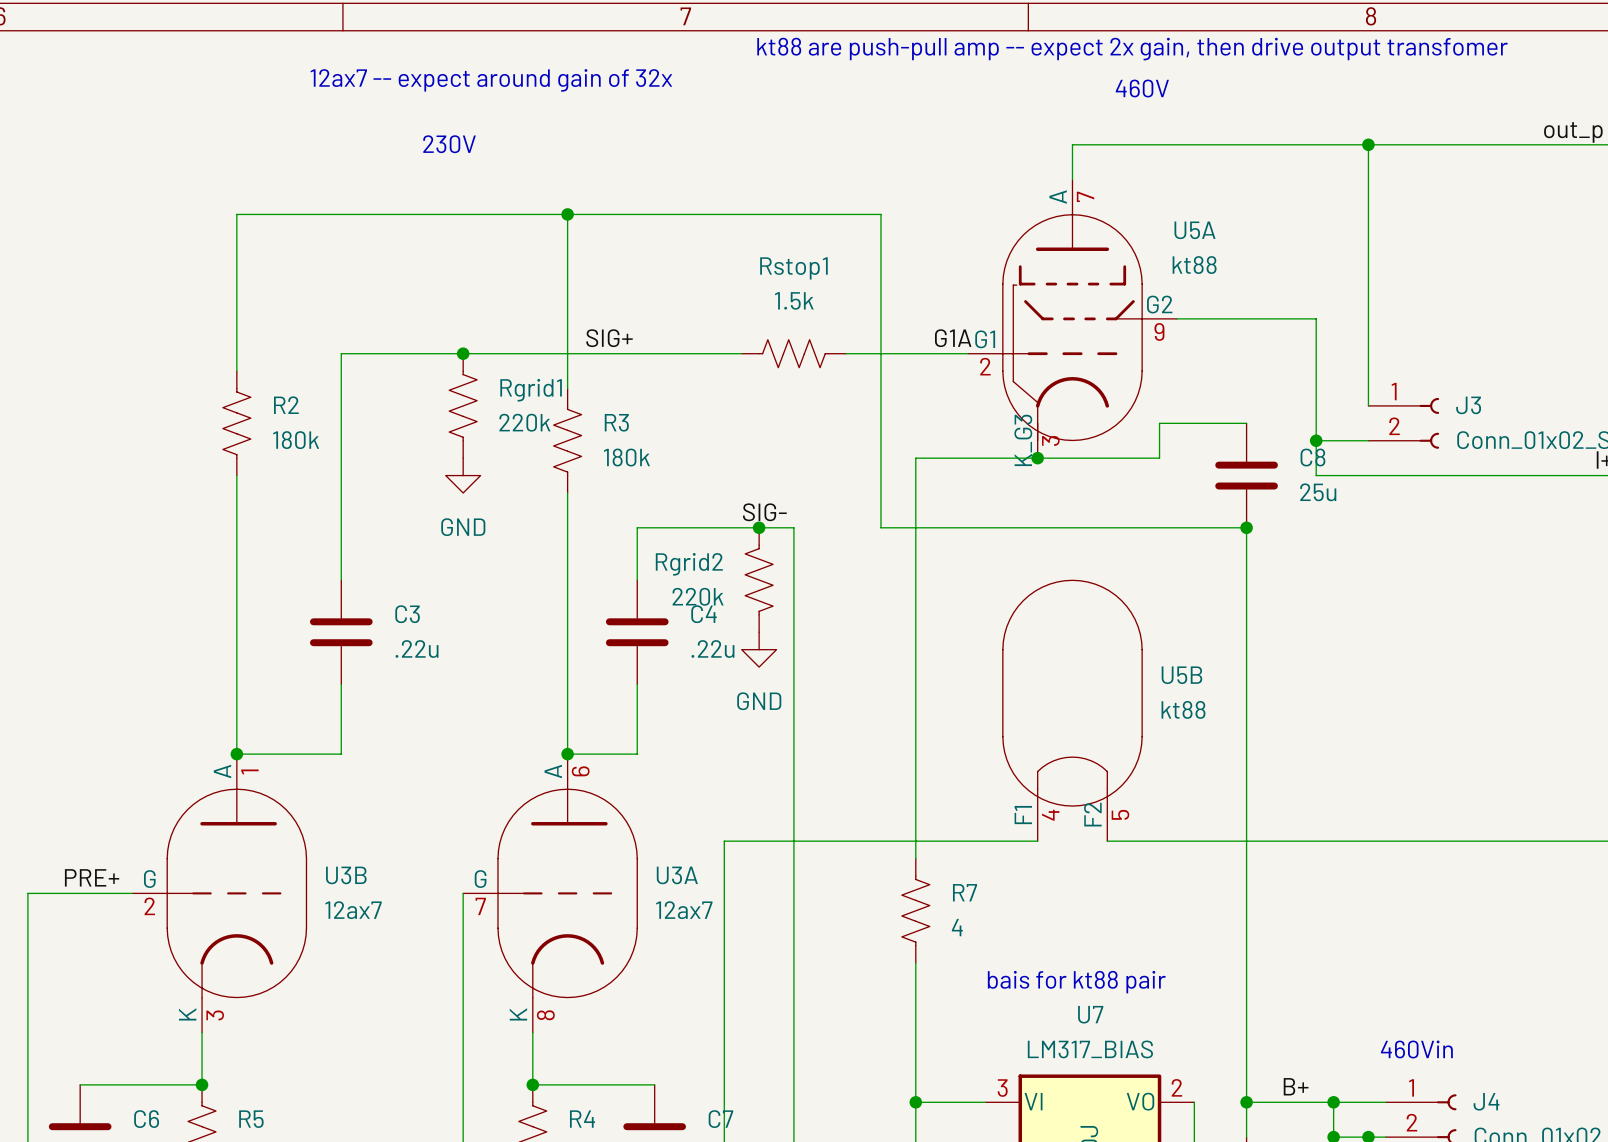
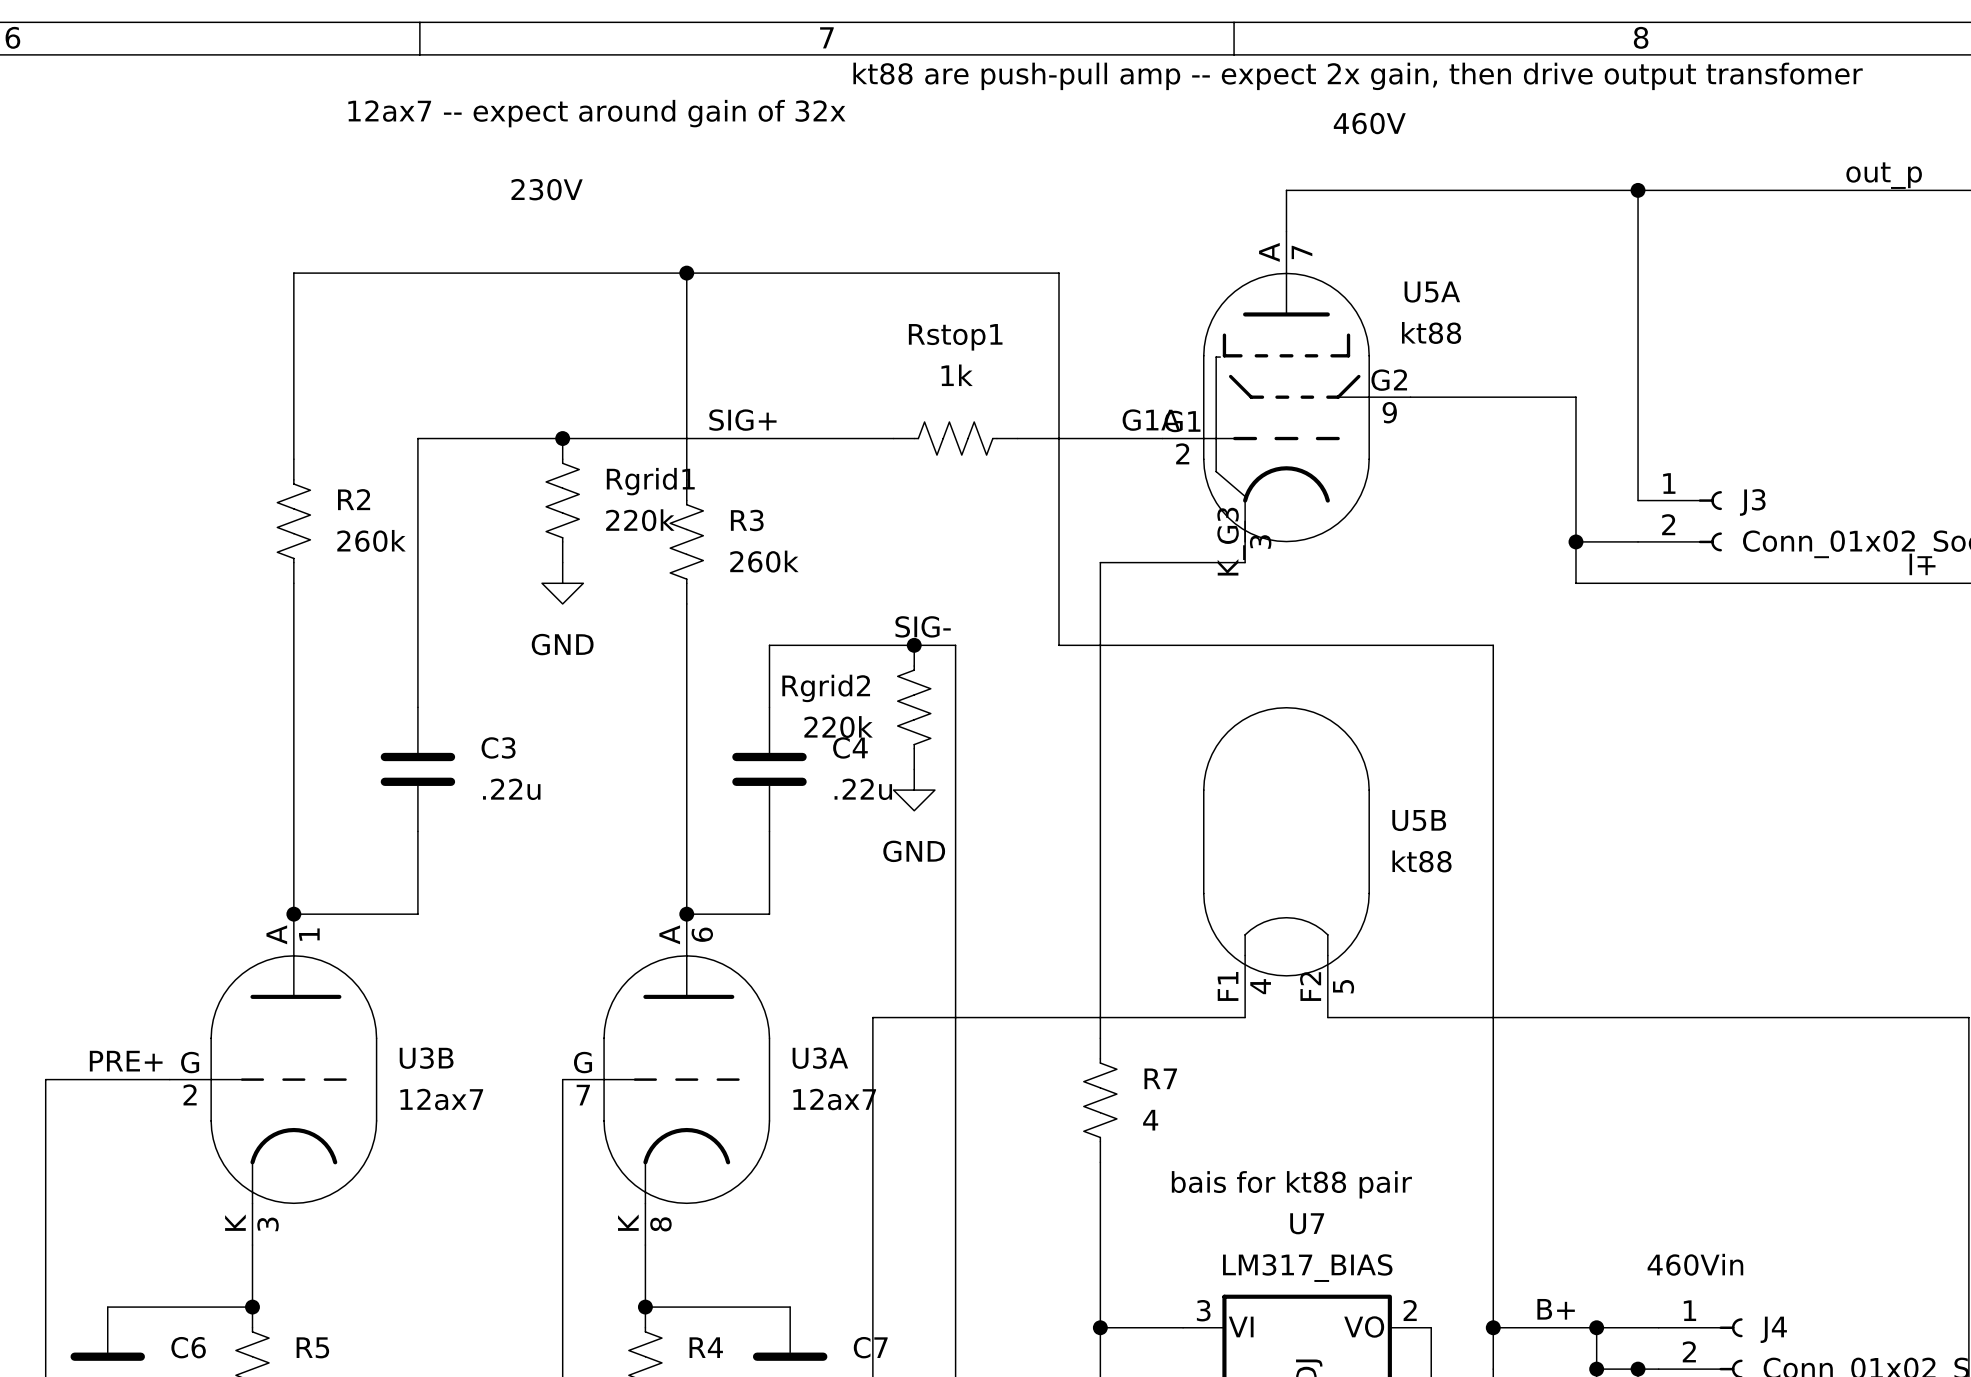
Rstop1 value: 1.5k (794, 300) -> 1k (957, 375)
wire: (1246, 423) (1159, 423) (1159, 458) (1037, 458) -> none
R2 value: 180k (296, 440) -> 260k (371, 540)
R3 value: 180k (626, 457) -> 260k (764, 561)
junction: (1037, 458) -> none
C8: 25u (1246, 475) -> none
junction: (1246, 527) -> none

